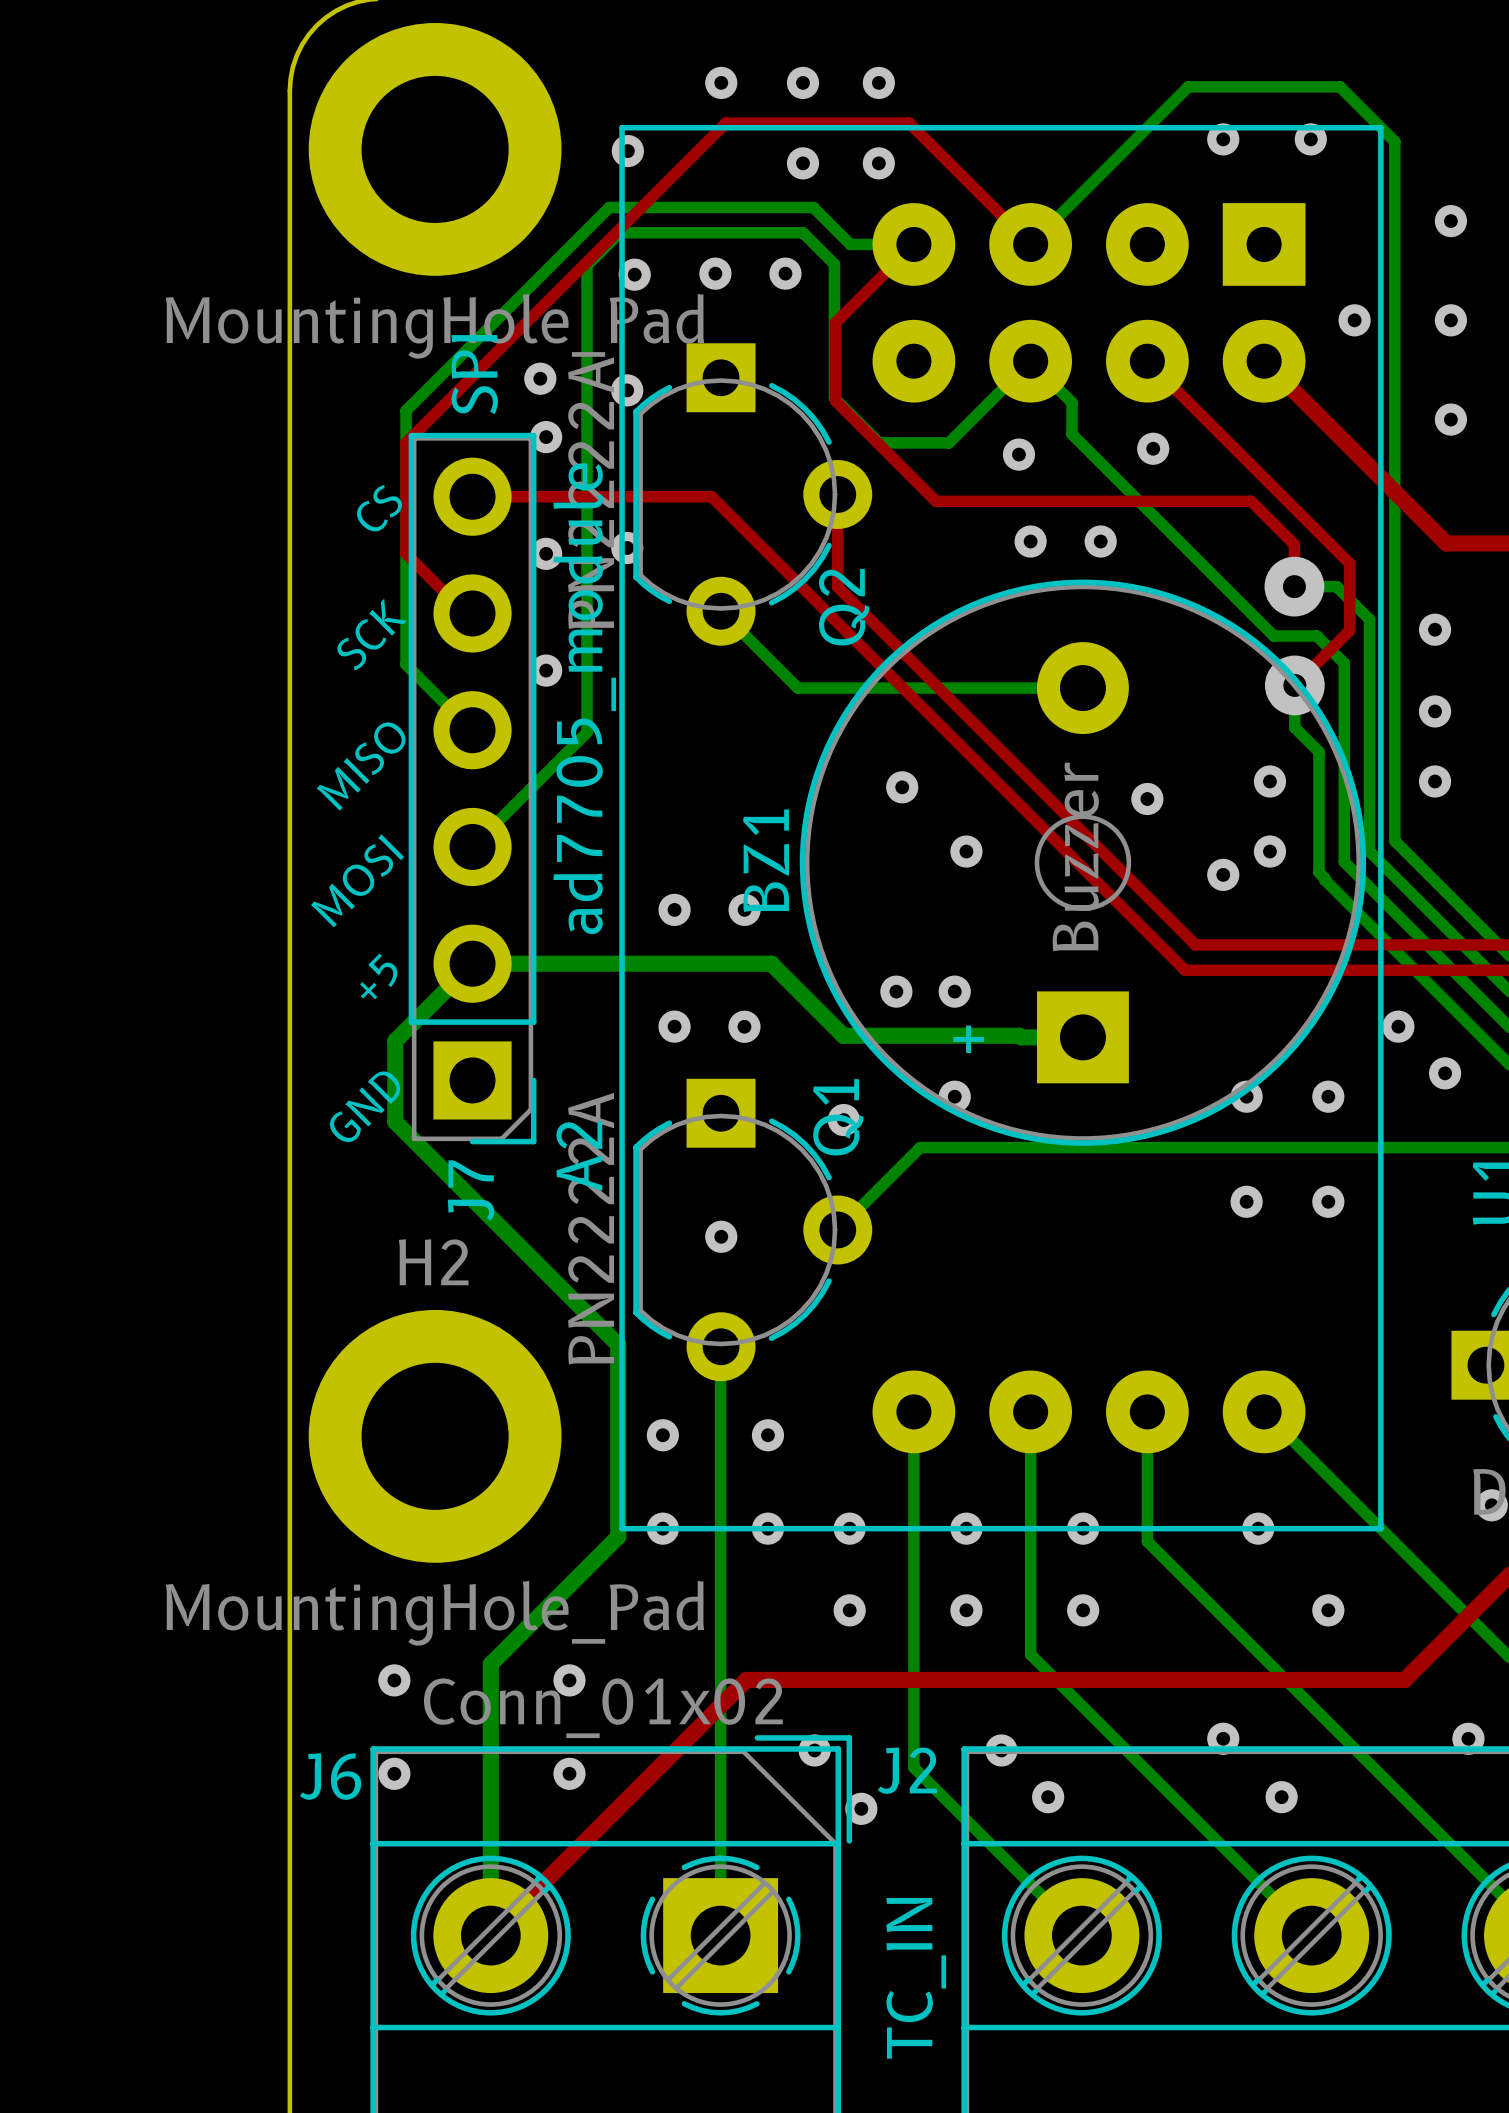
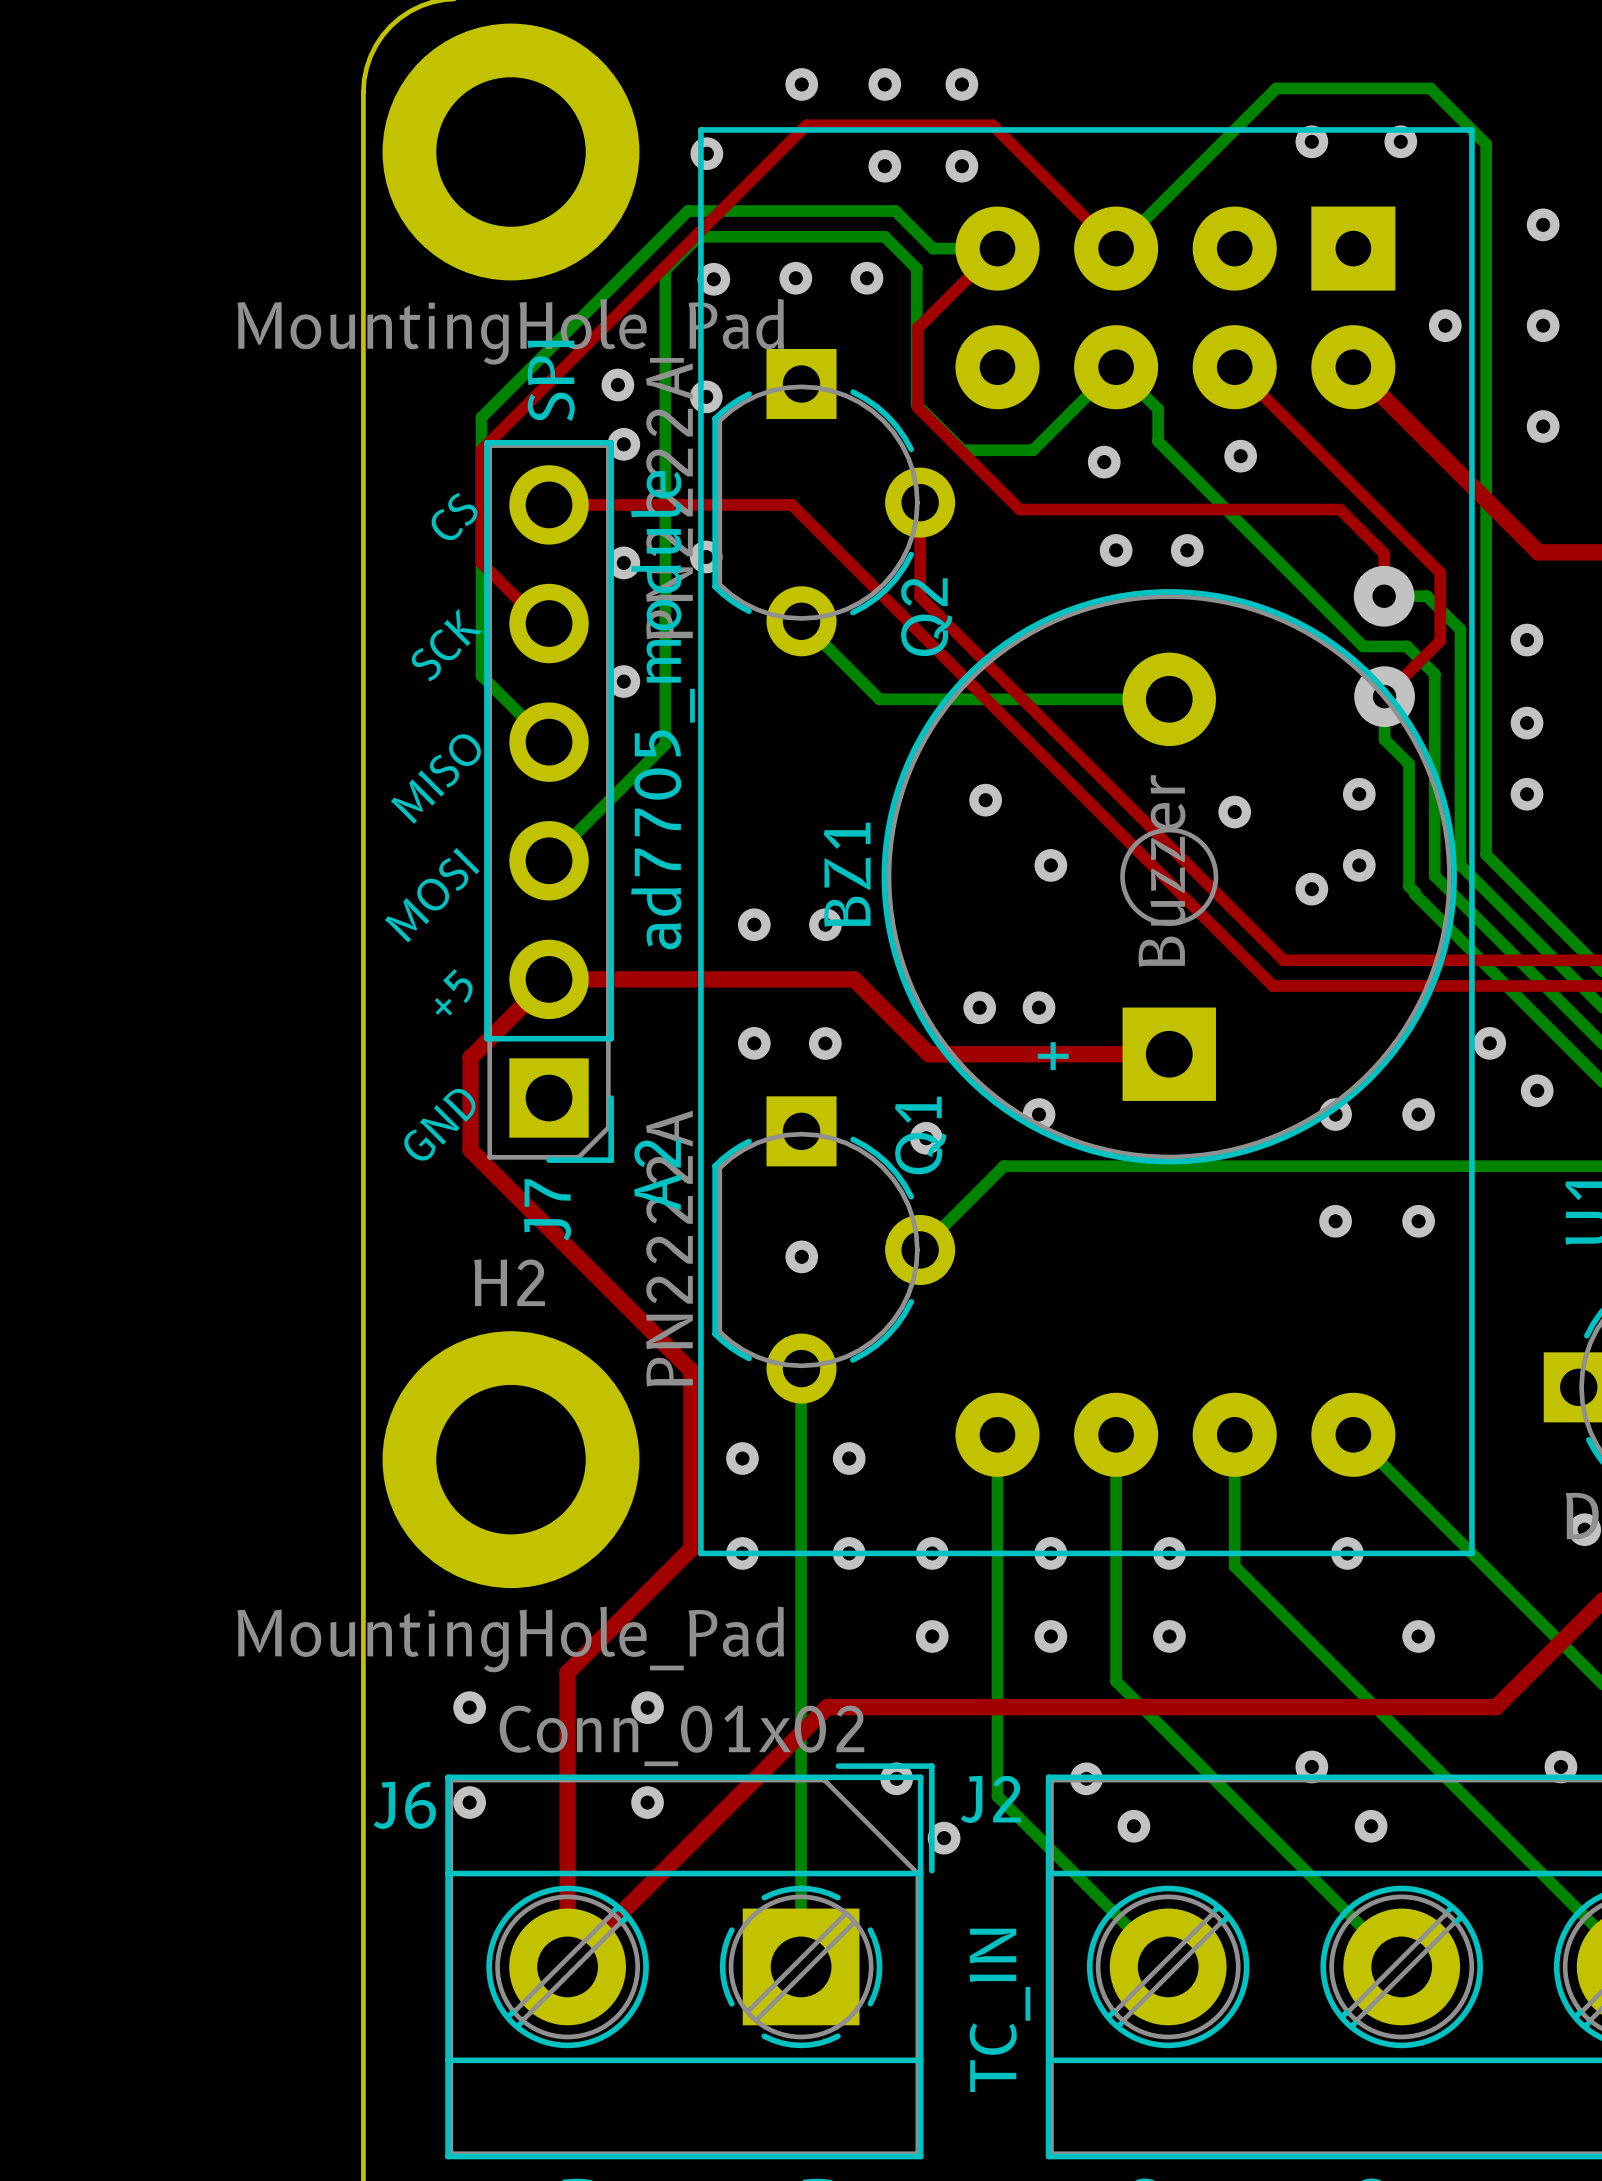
bottom track: (1082, 1037) (843, 1035) (771, 963) (472, 963) (395, 1040) (395, 1121) (618, 1344) (618, 1536) (490, 1664) (490, 1935) -> none
top track: none -> (1169, 1054) (929, 1054) (854, 979) (549, 979) (470, 1057) (470, 1150) (691, 1370) (691, 1548) (567, 1672) (567, 1966)

